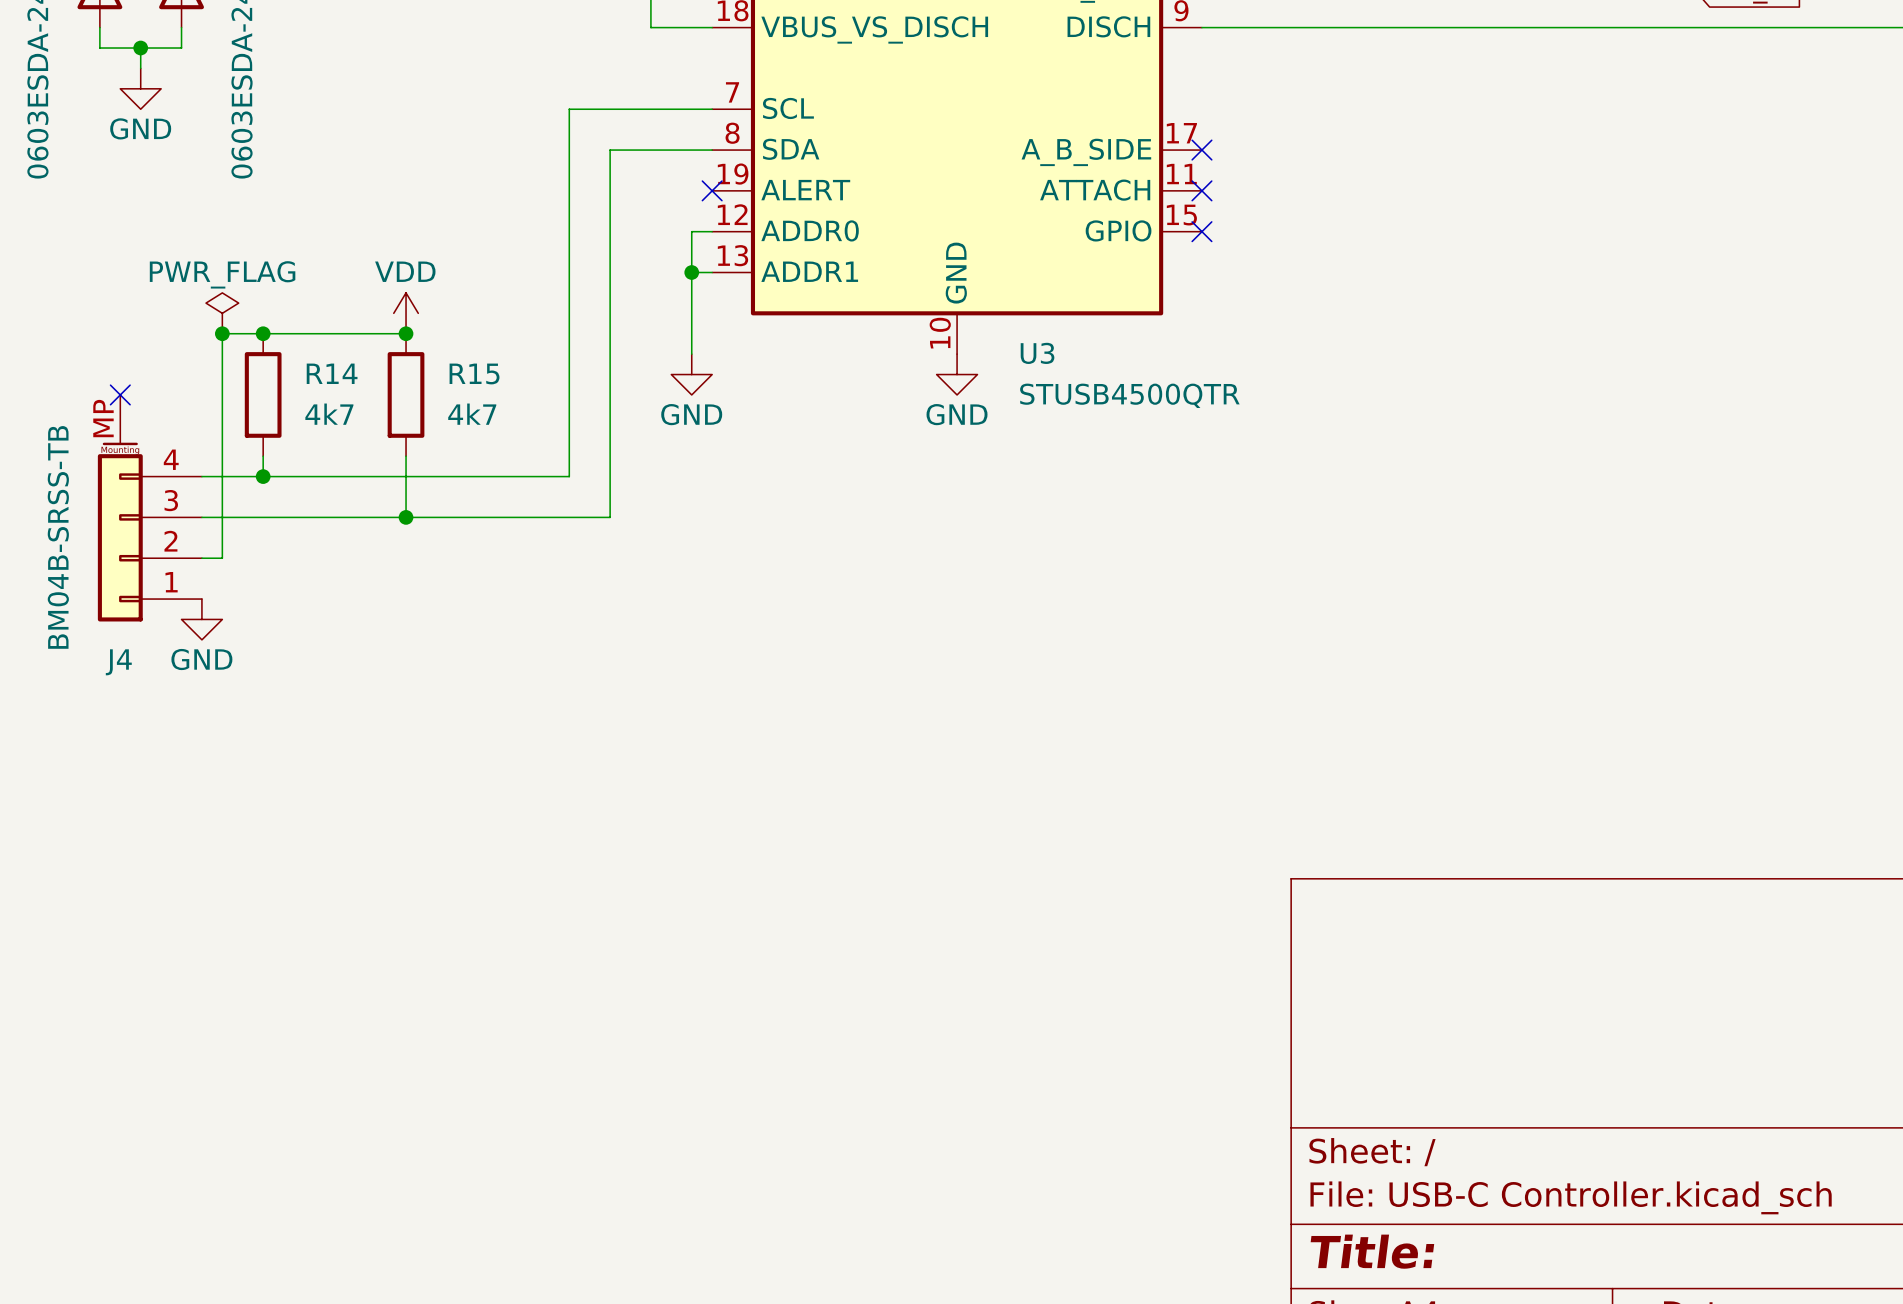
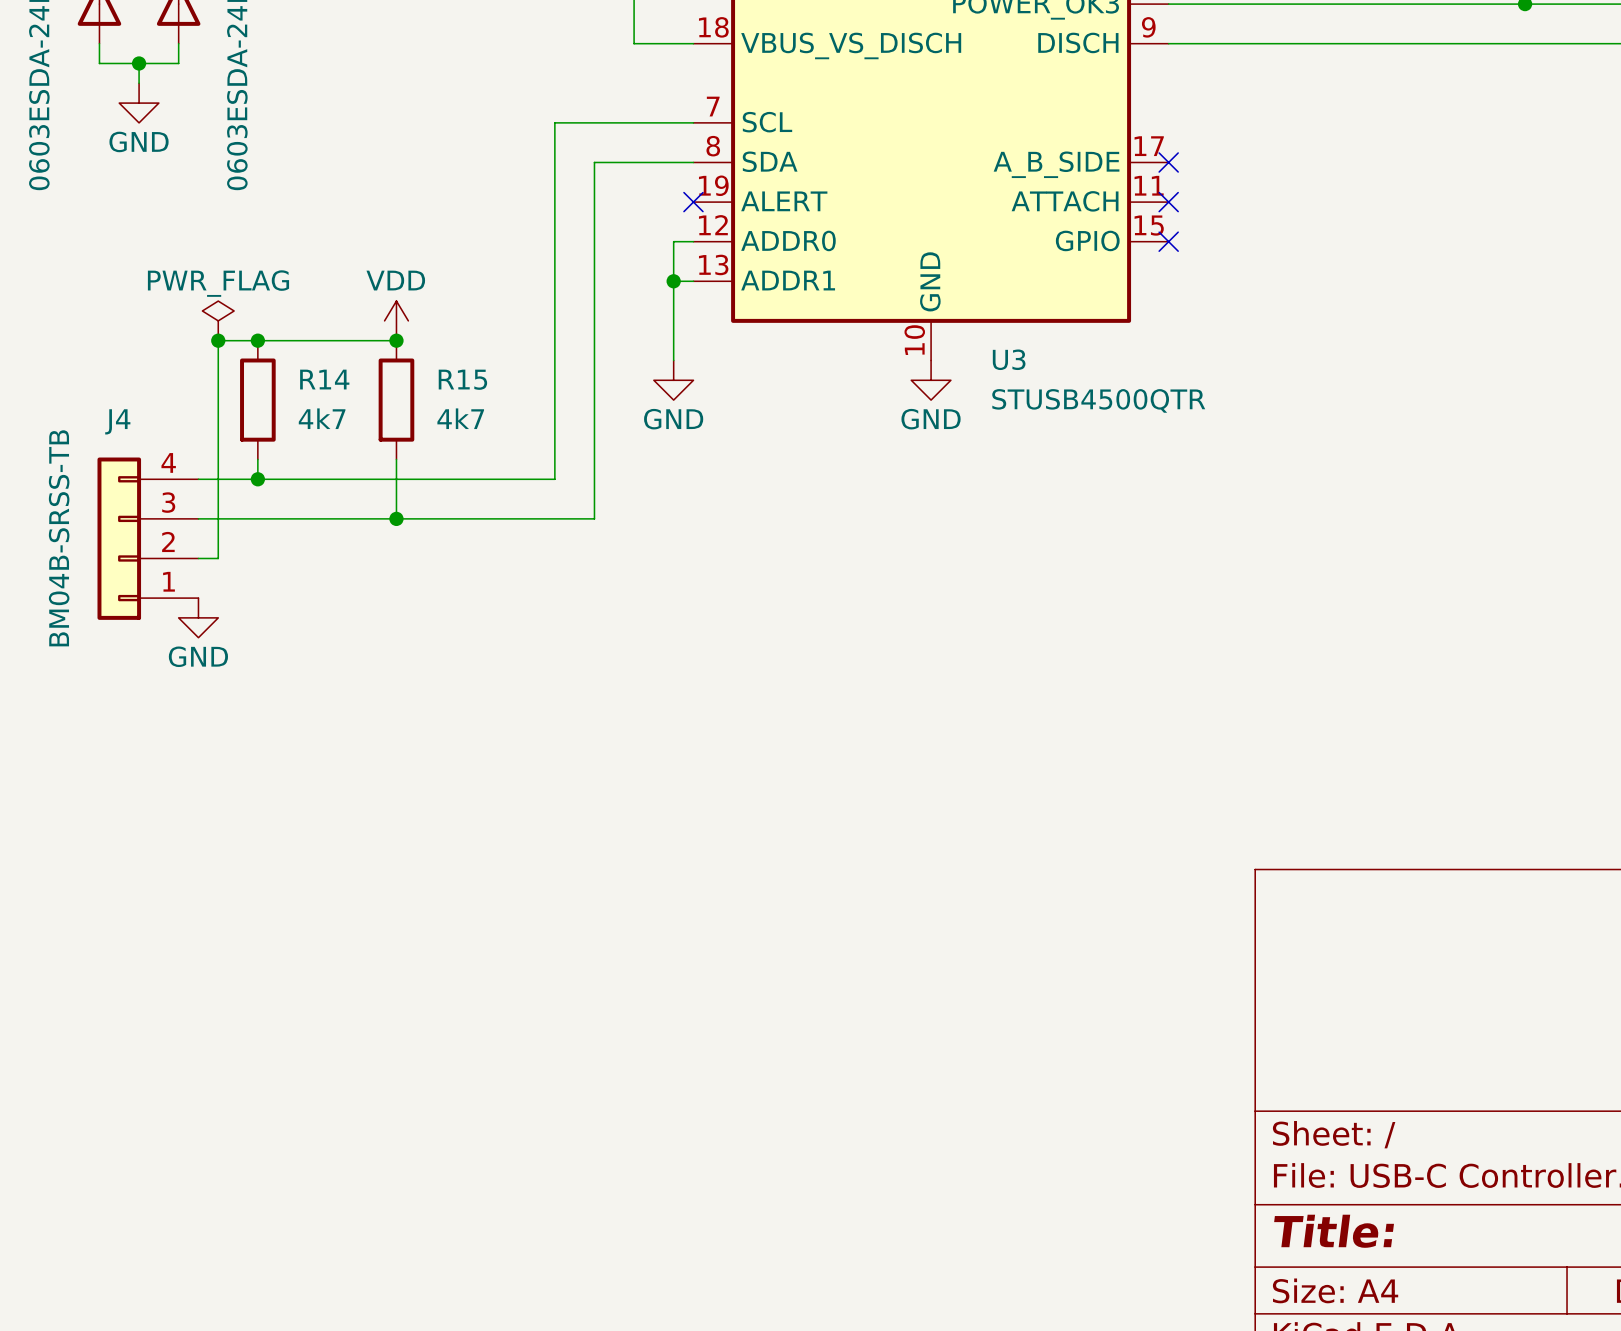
J4 symbol: [97, 394, 202, 622] -> [97, 457, 199, 620]
no-connect mark: (120, 394) -> none
J4 name position: J4 (118, 662) -> J4 (117, 421)

